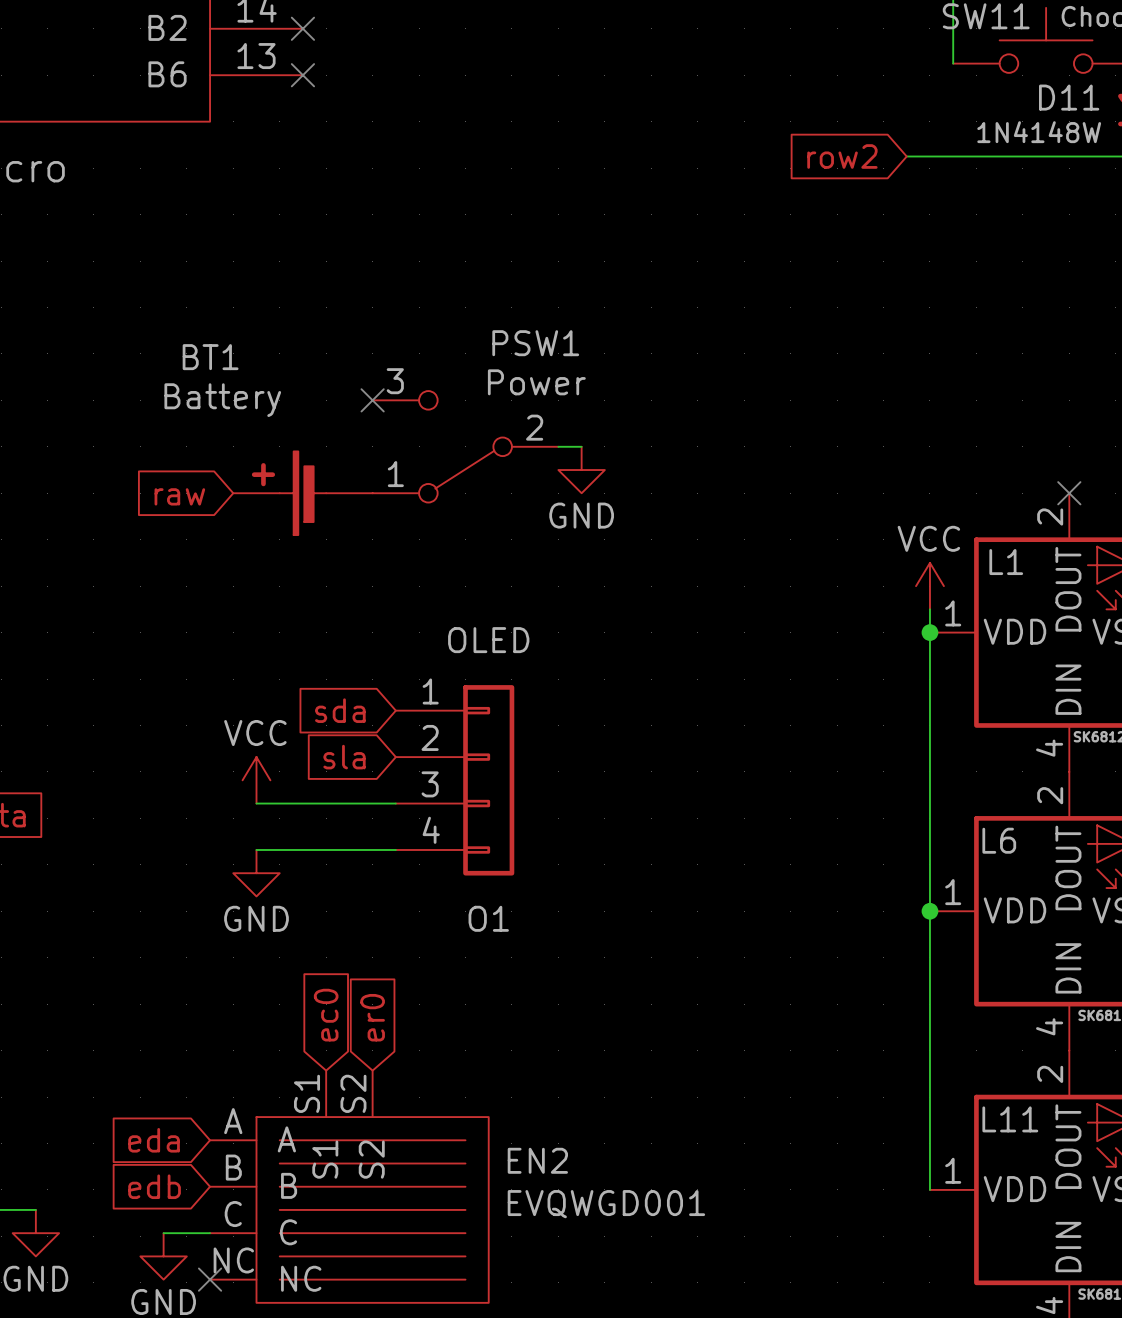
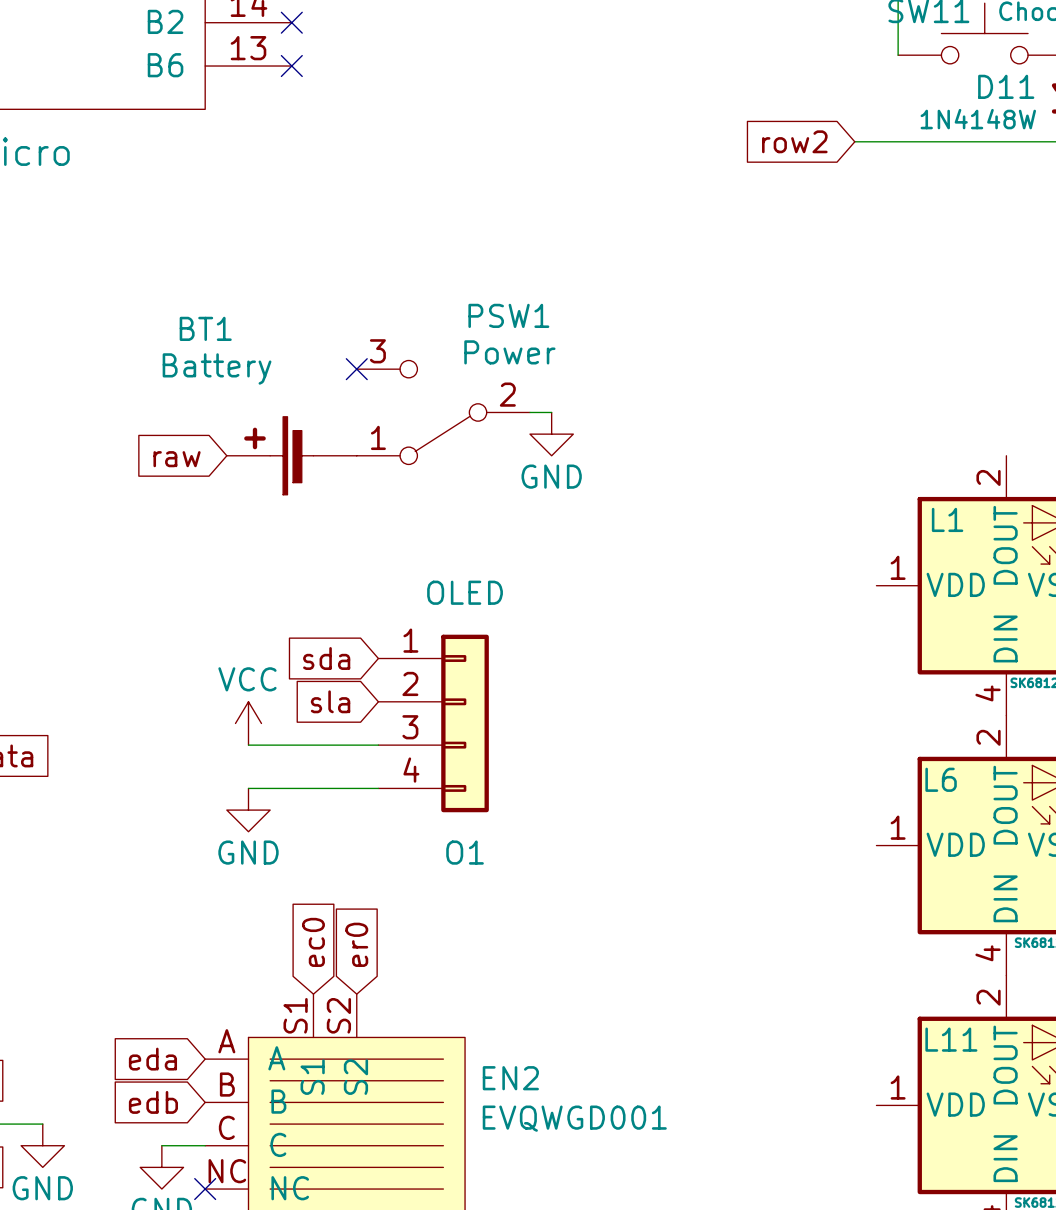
no-connect mark: (1069, 493) -> none
power symbol: VCC (929, 586) -> none
wire: (929, 609) (929, 1189) -> none
junction: (929, 632) -> none
junction: (929, 911) -> none

